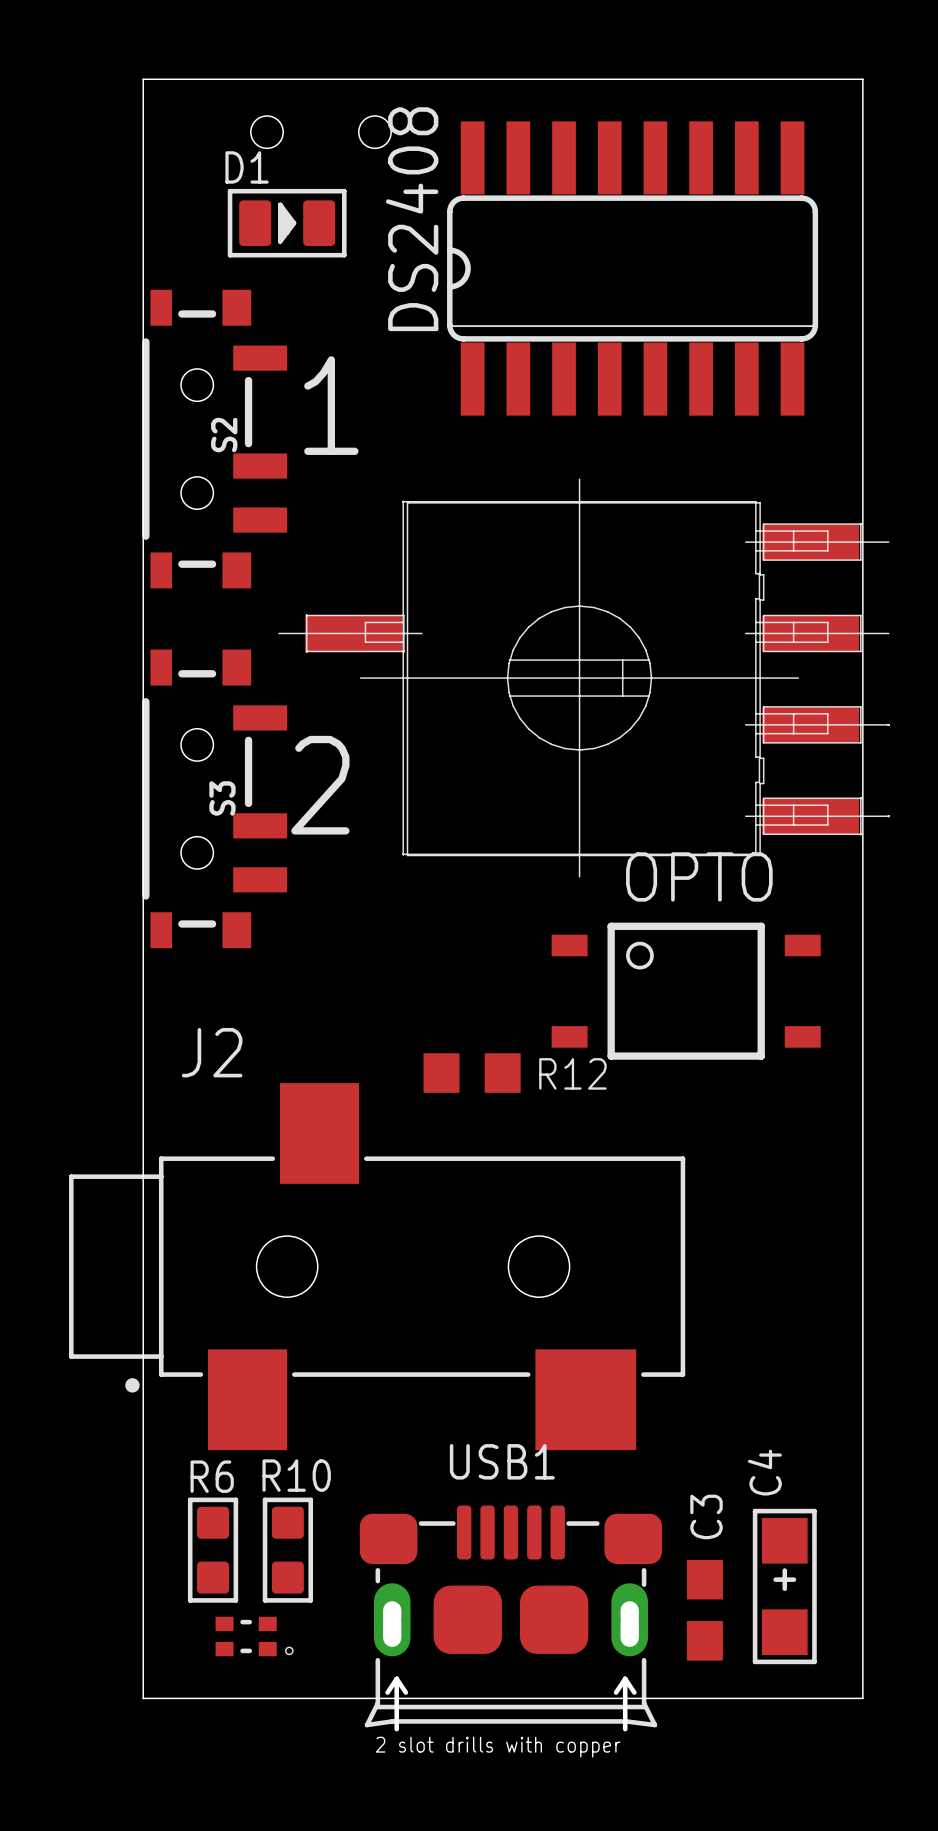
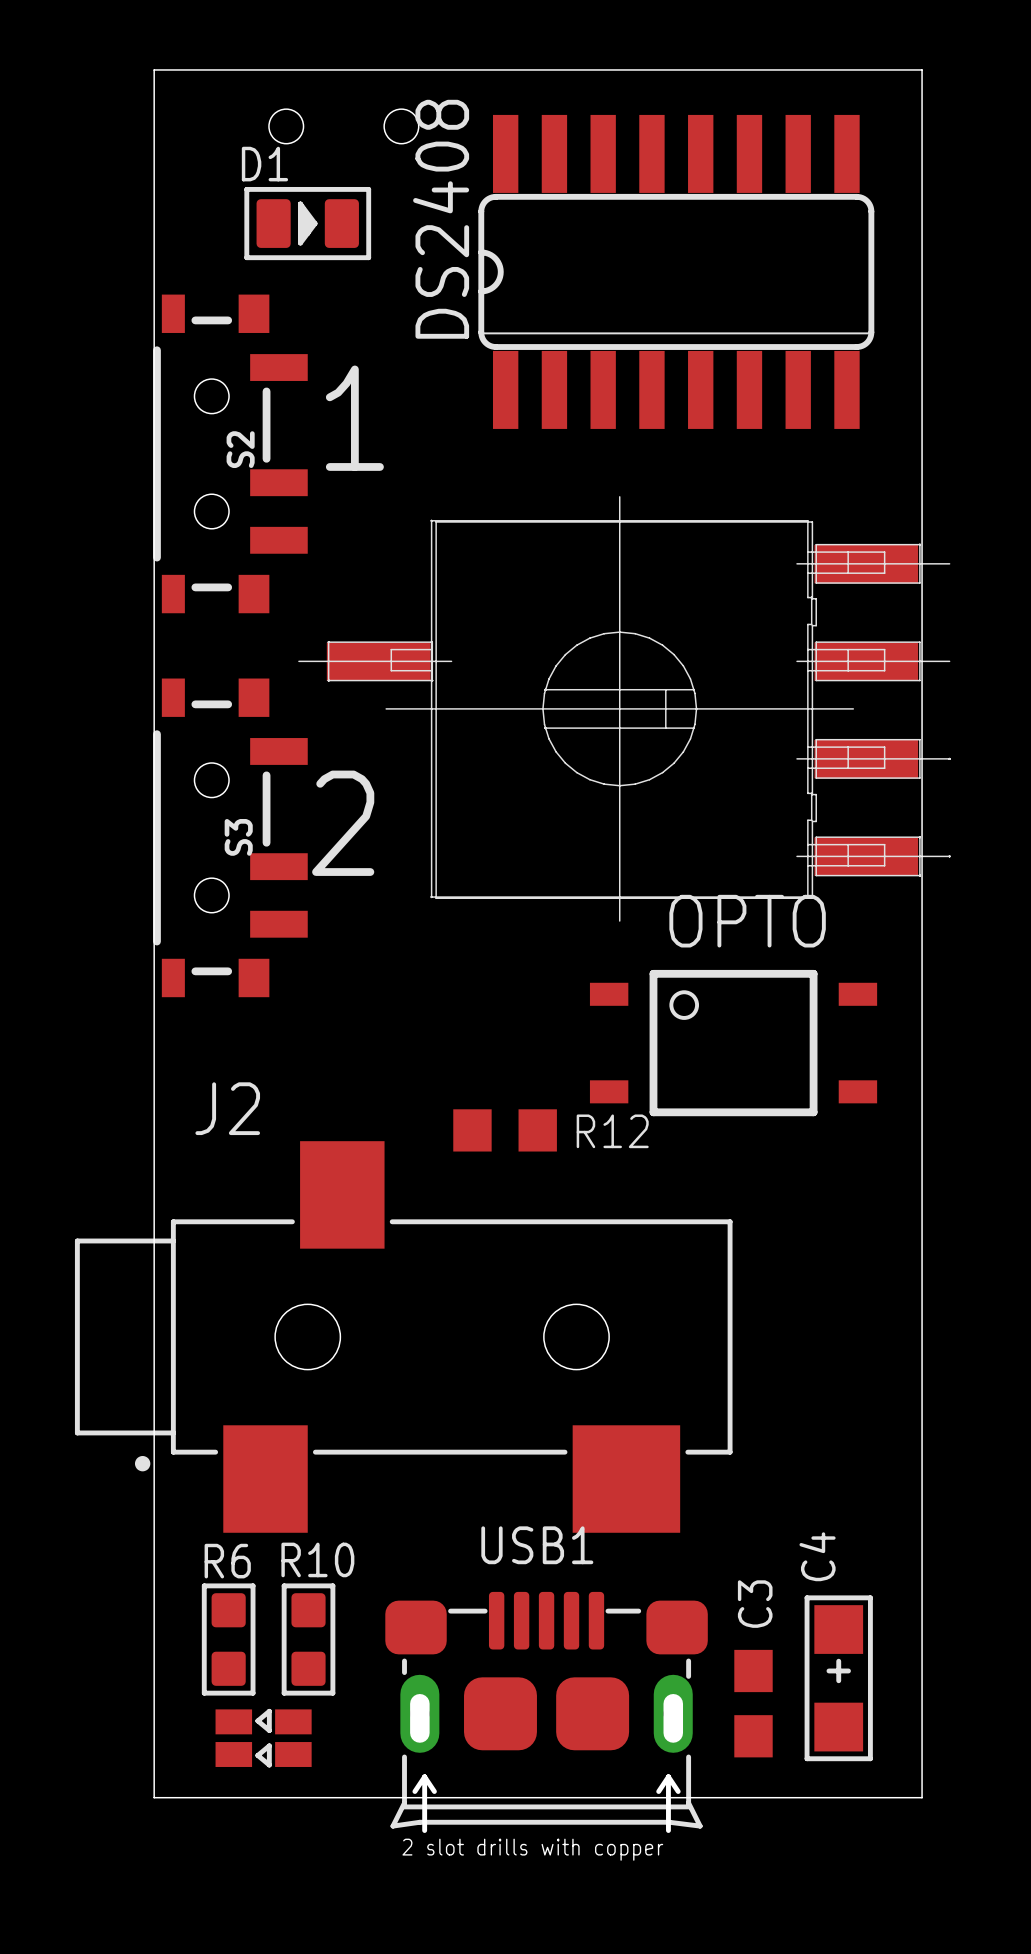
part footprint: [215, 1616, 294, 1657] -> [215, 1708, 312, 1768]

